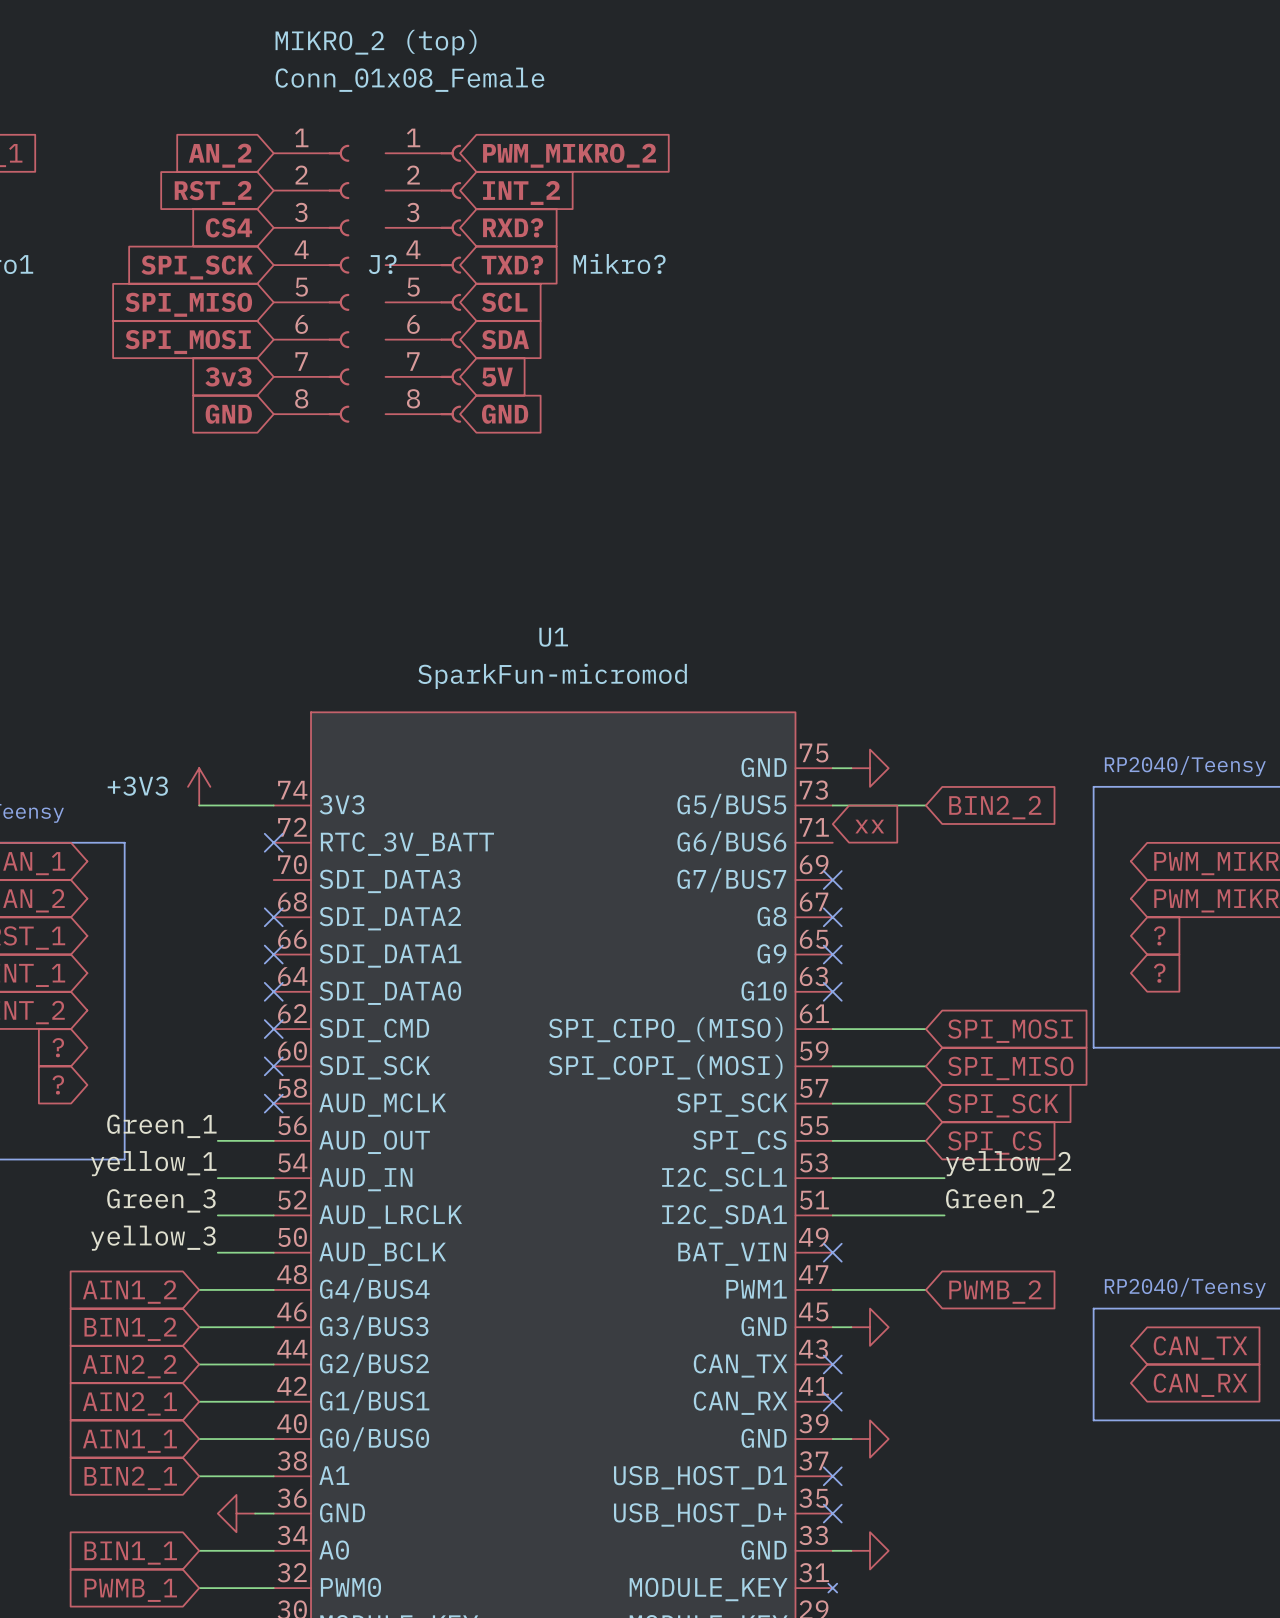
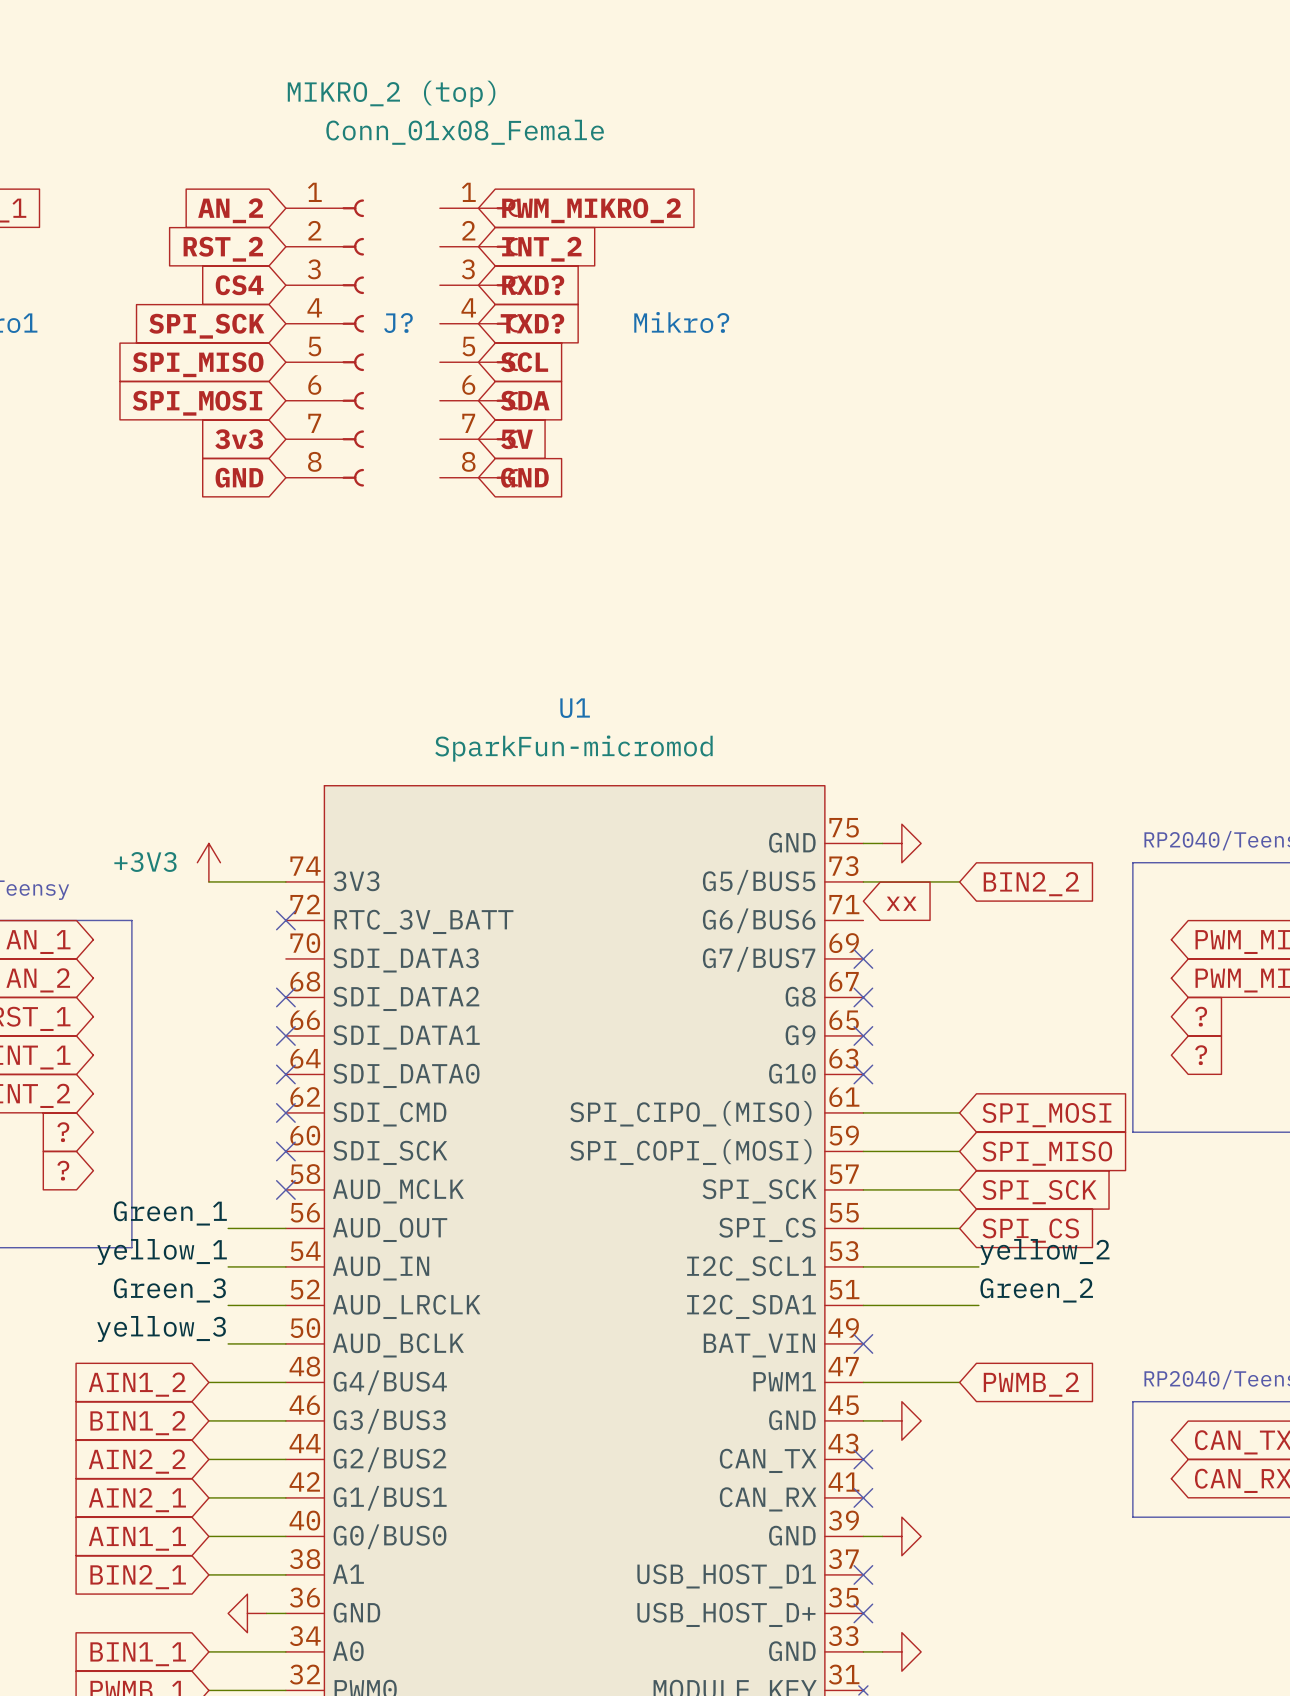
Mikro? position: (423, 283) -> (478, 342)

